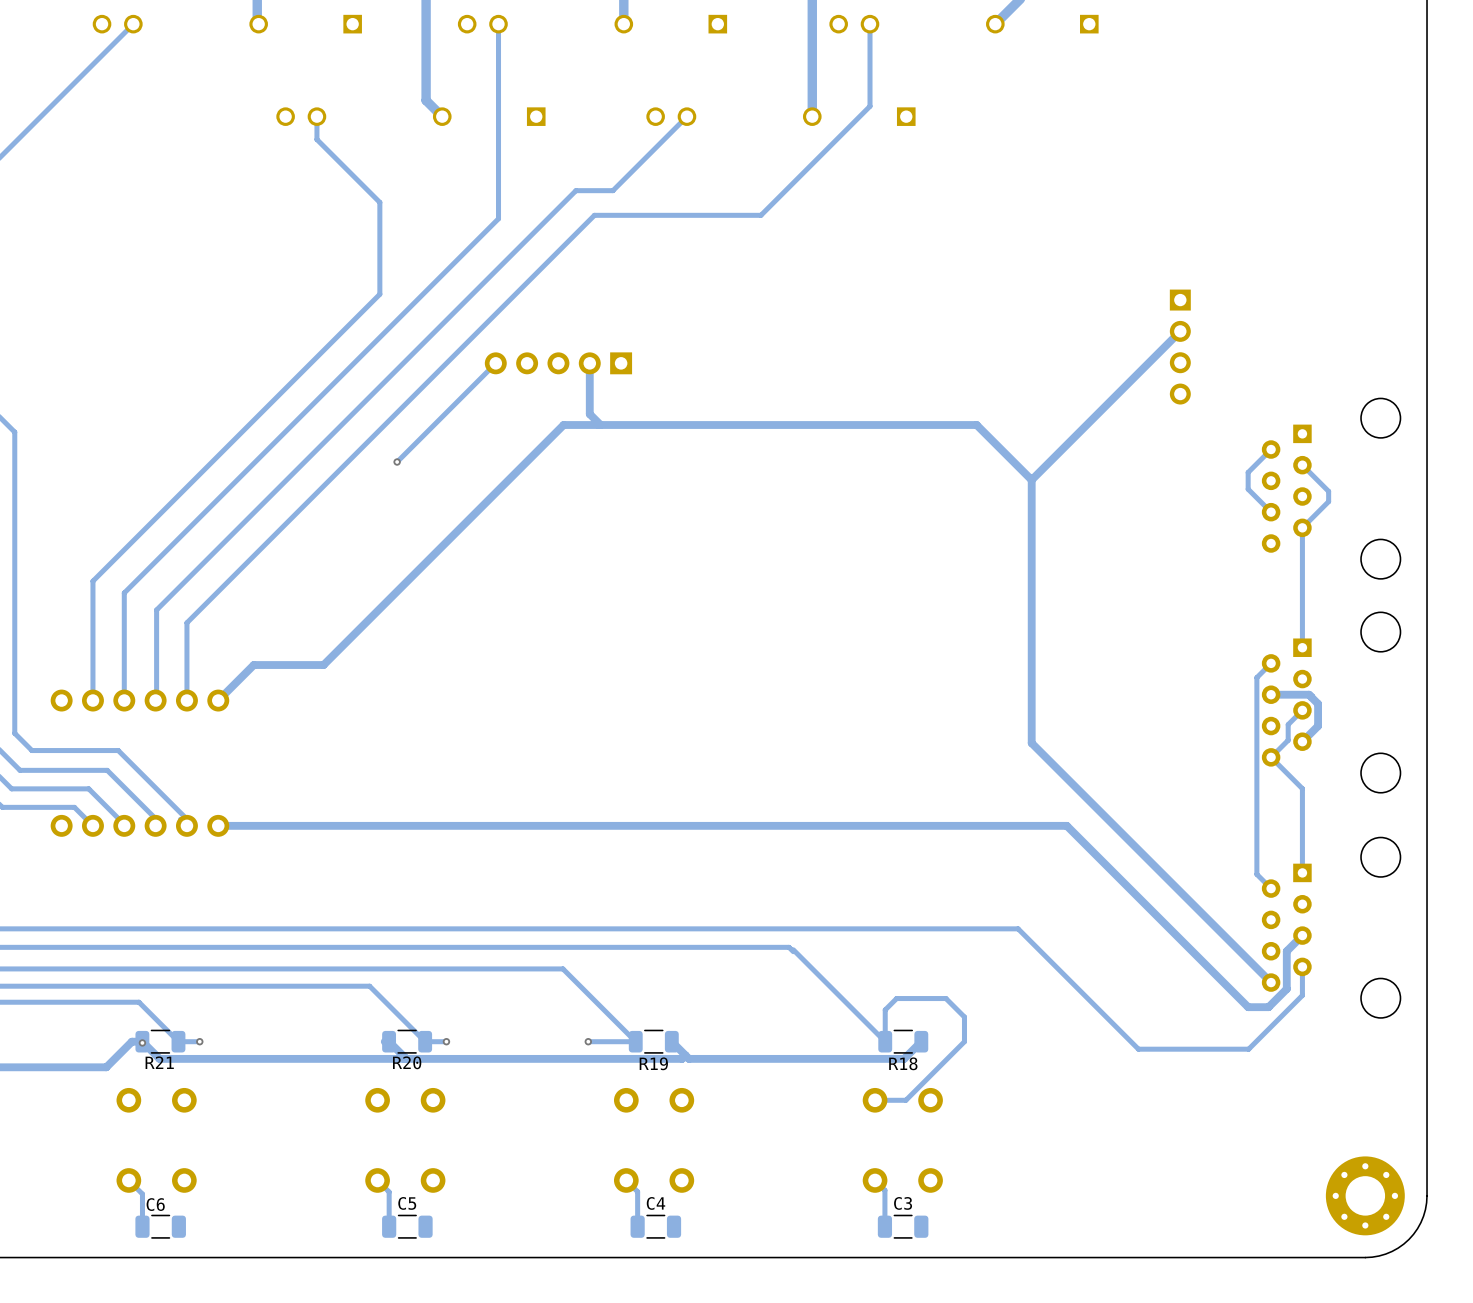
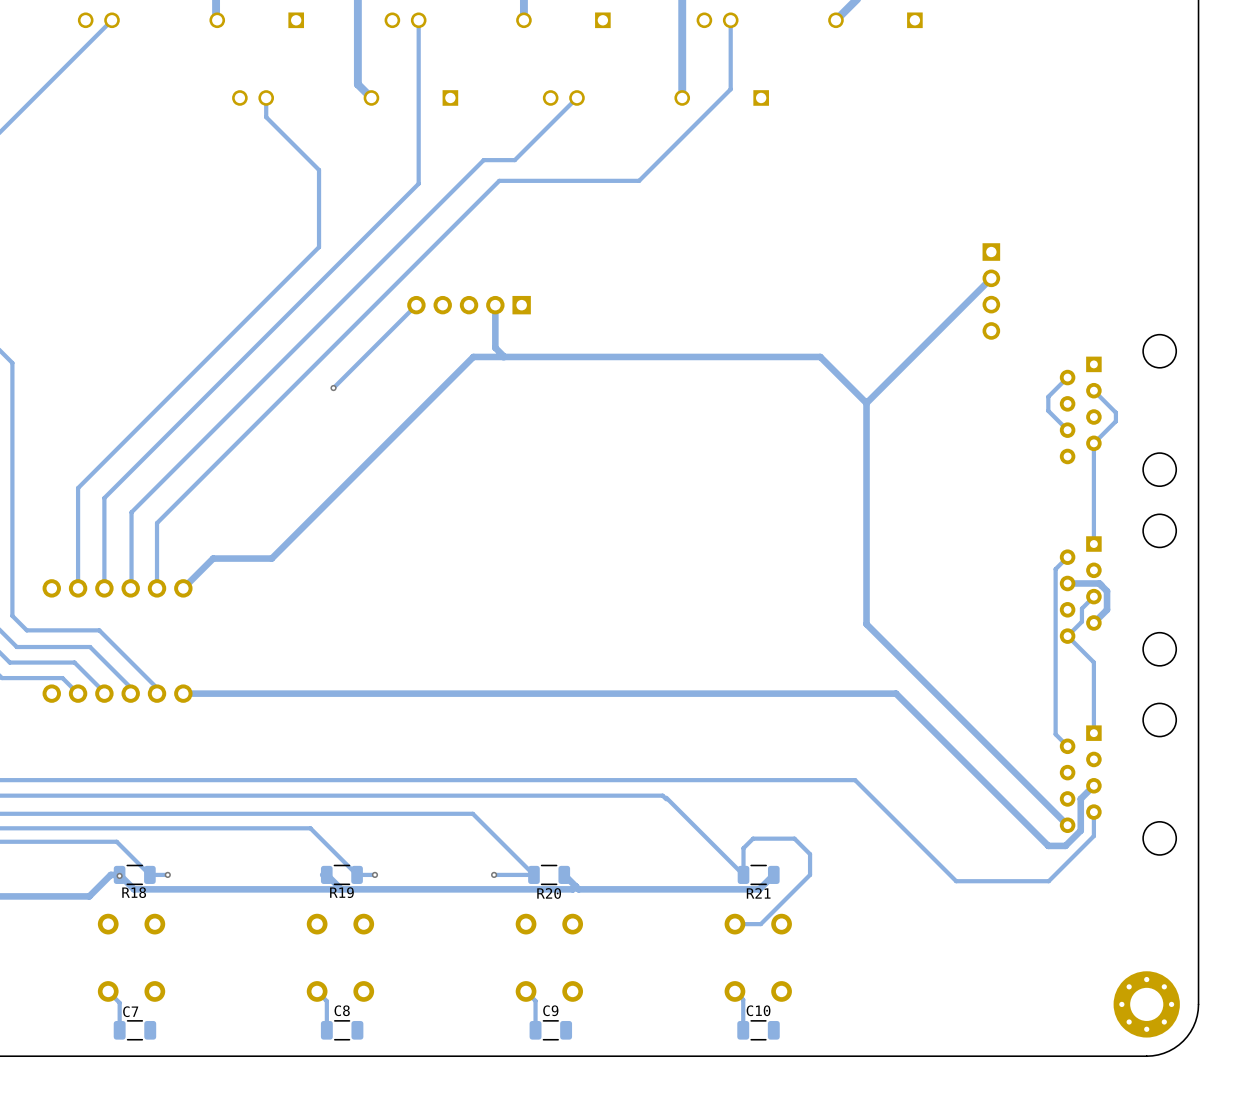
R21 name: R21 (159, 1062) -> R18 (134, 892)
R20 name: R20 (407, 1062) -> R19 (341, 892)
R19 name: R19 (653, 1063) -> R20 (549, 893)
R18 name: R18 (903, 1063) -> R21 (758, 893)
C5 name: C5 (407, 1203) -> C8 (342, 1010)
C4 name: C4 (655, 1203) -> C9 (550, 1010)
C3 name: C3 (903, 1203) -> C10 (758, 1010)
C6 name: C6 (155, 1204) -> C7 (130, 1011)

